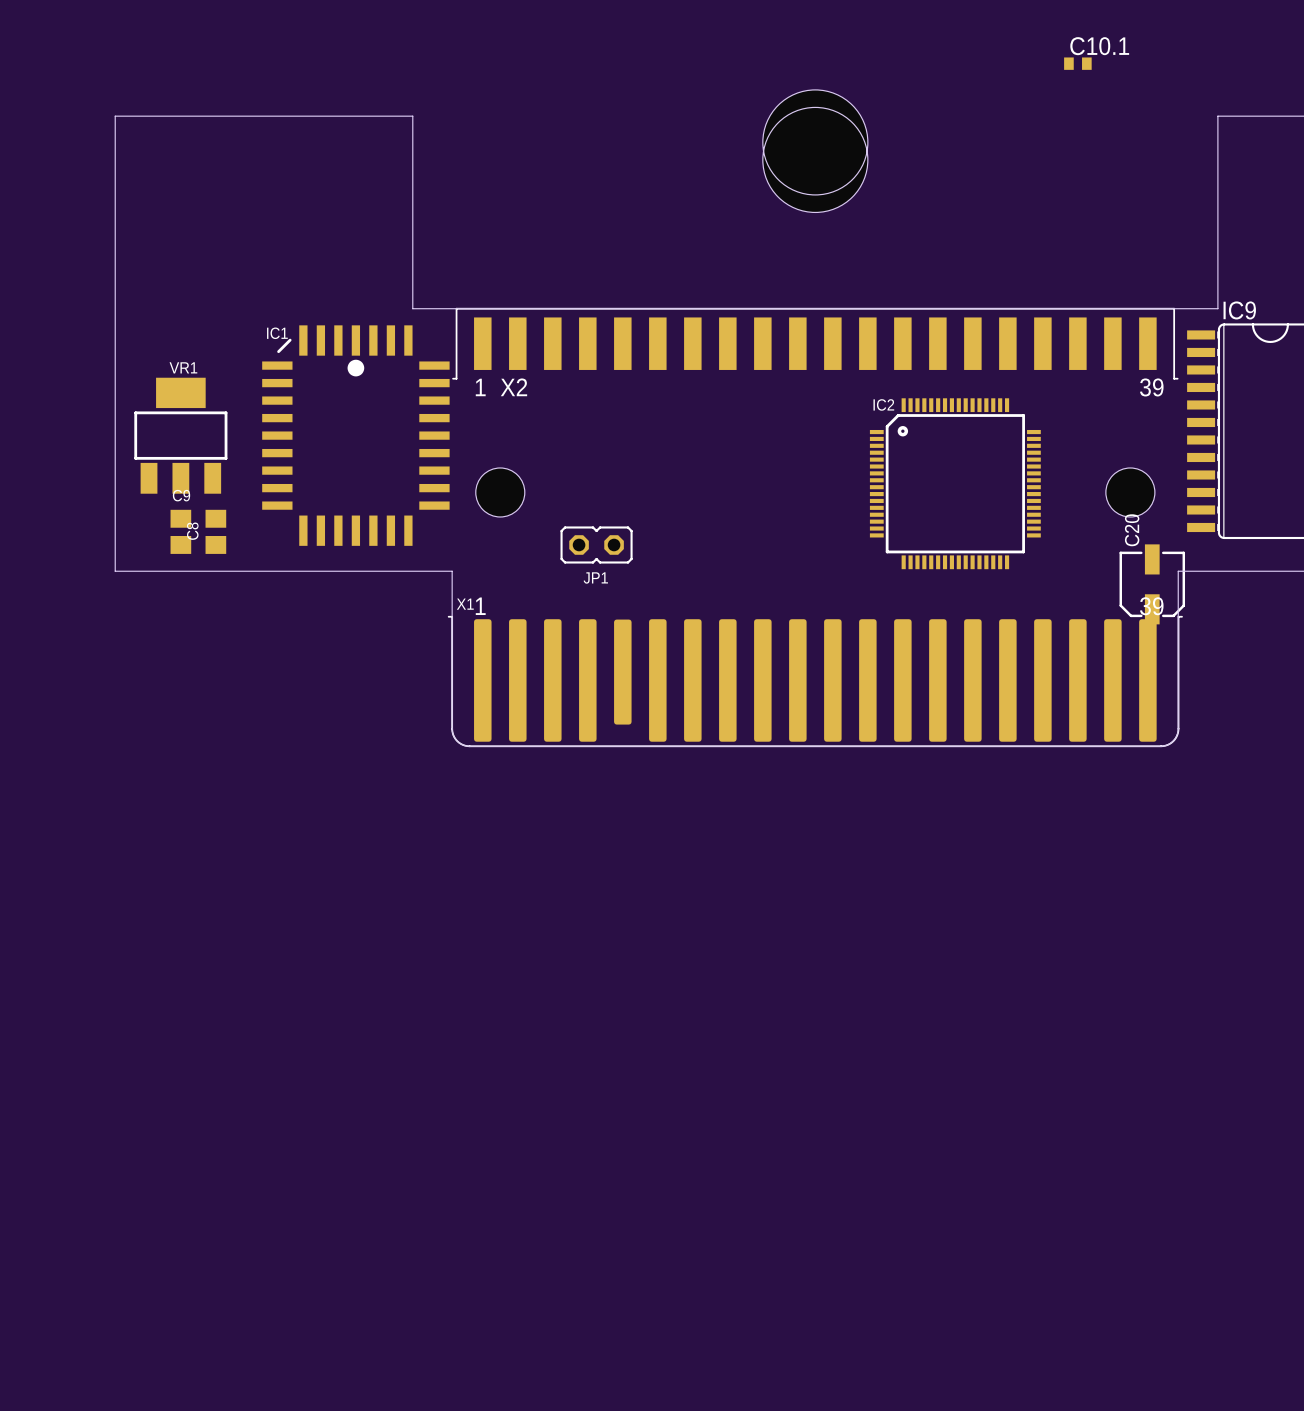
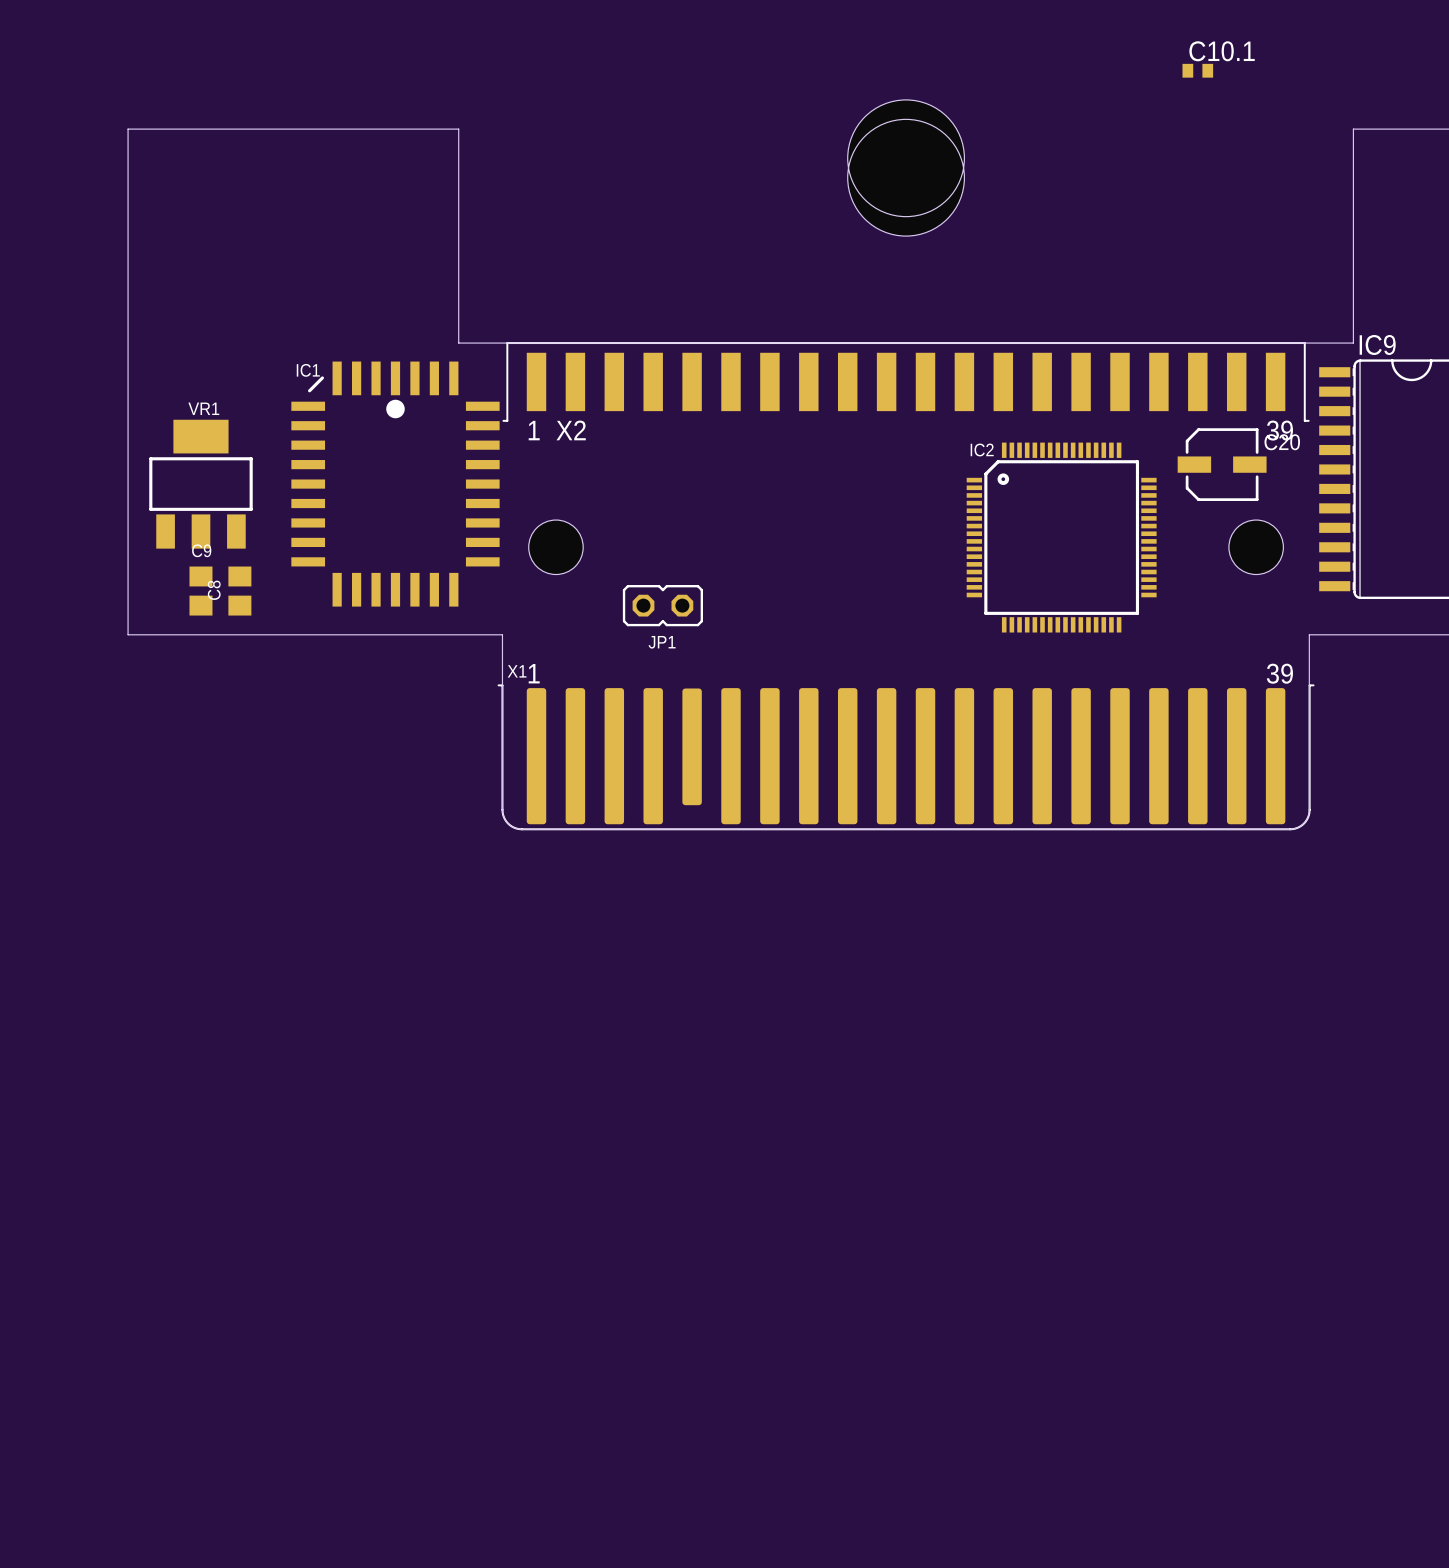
C20 rotation: 0° (1152, 584) -> 90° clockwise (1222, 464)
C20 position: (1152, 584) -> (1222, 464)

